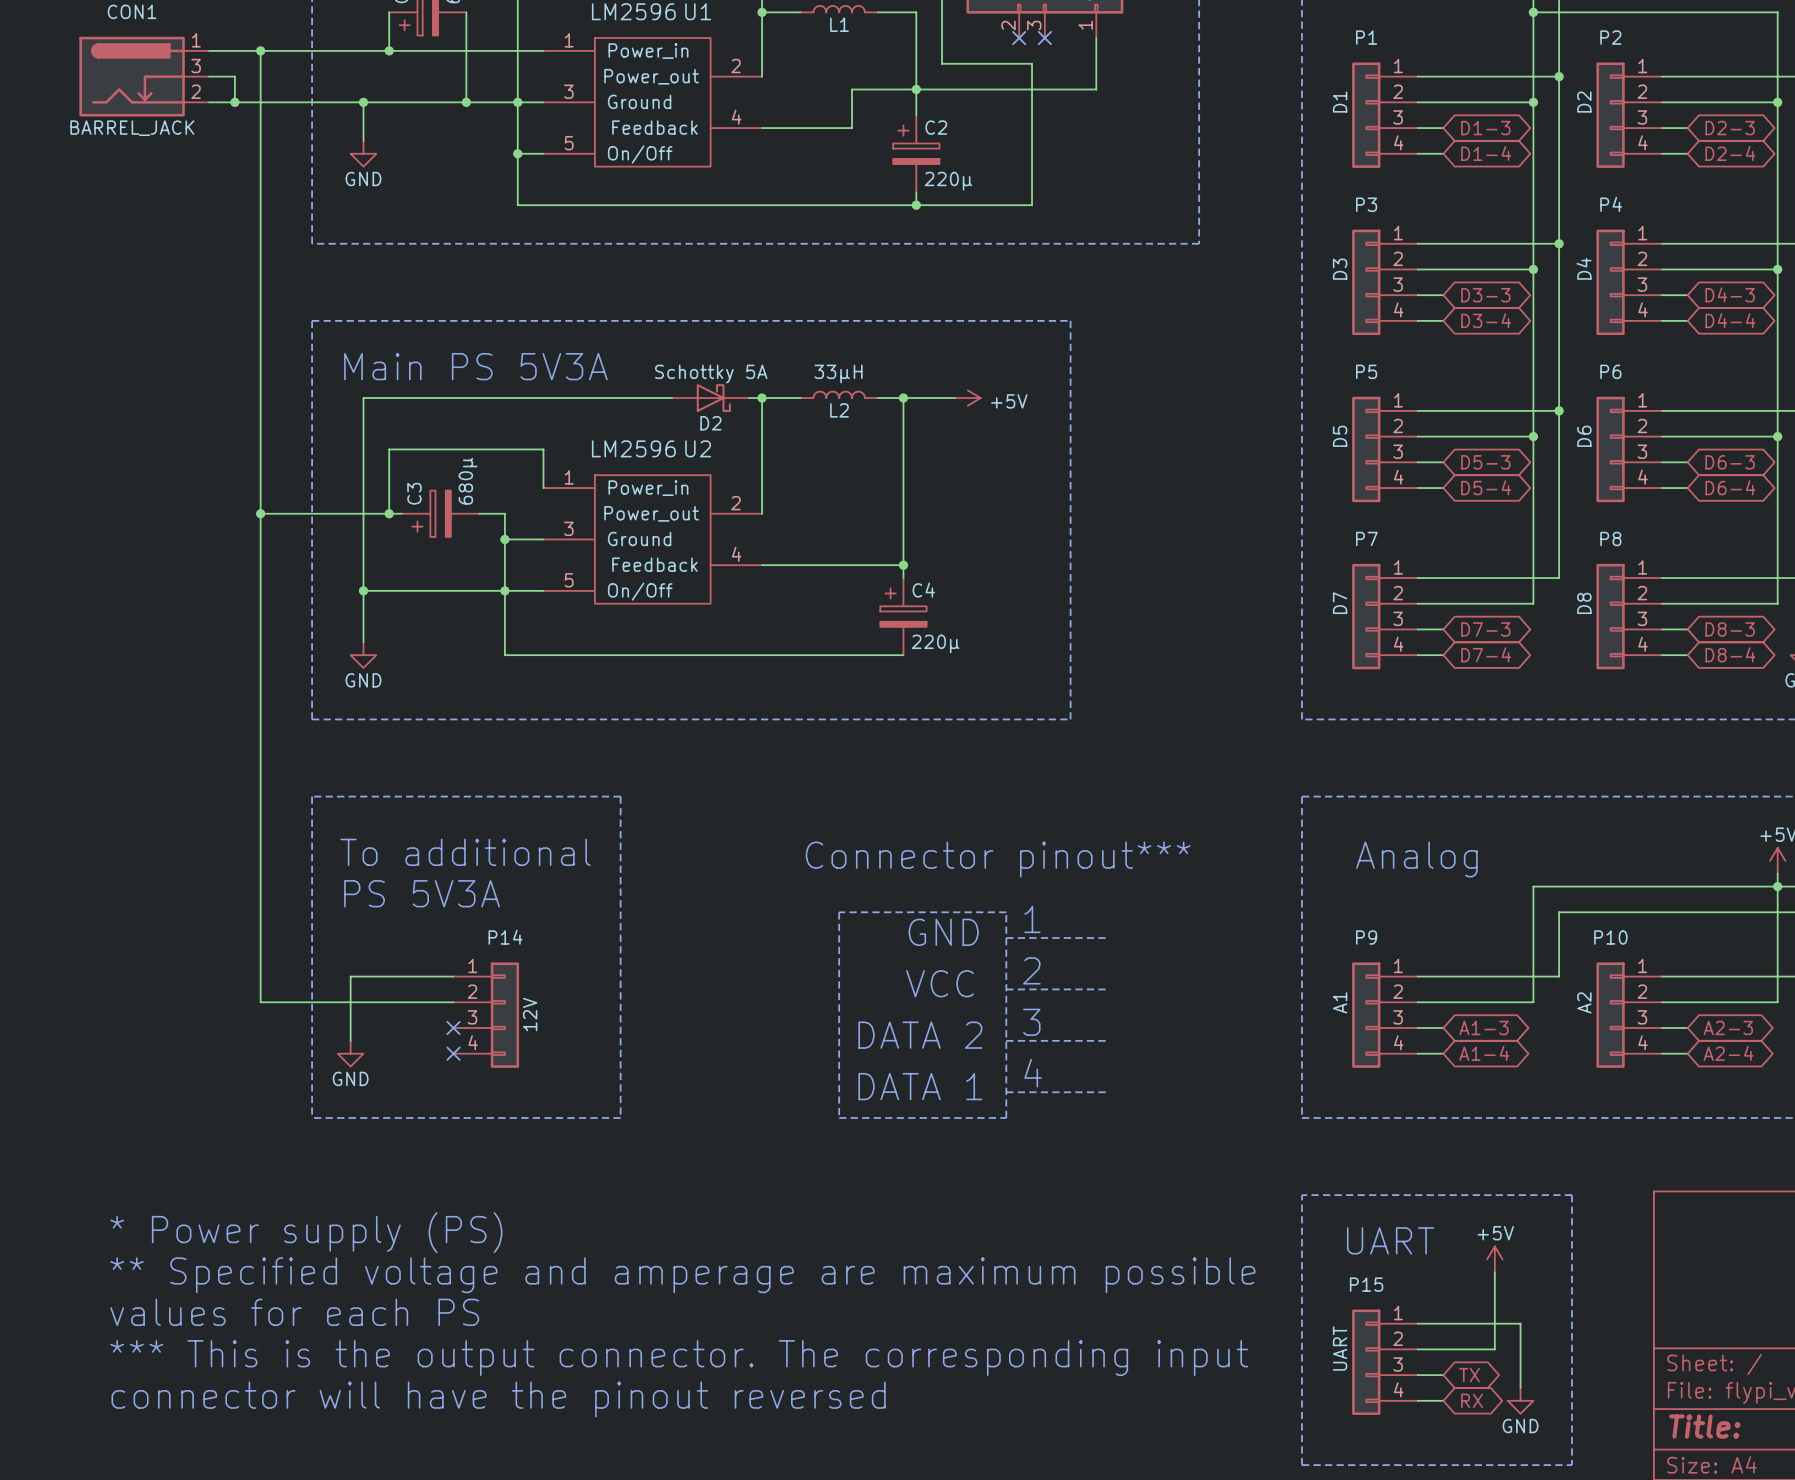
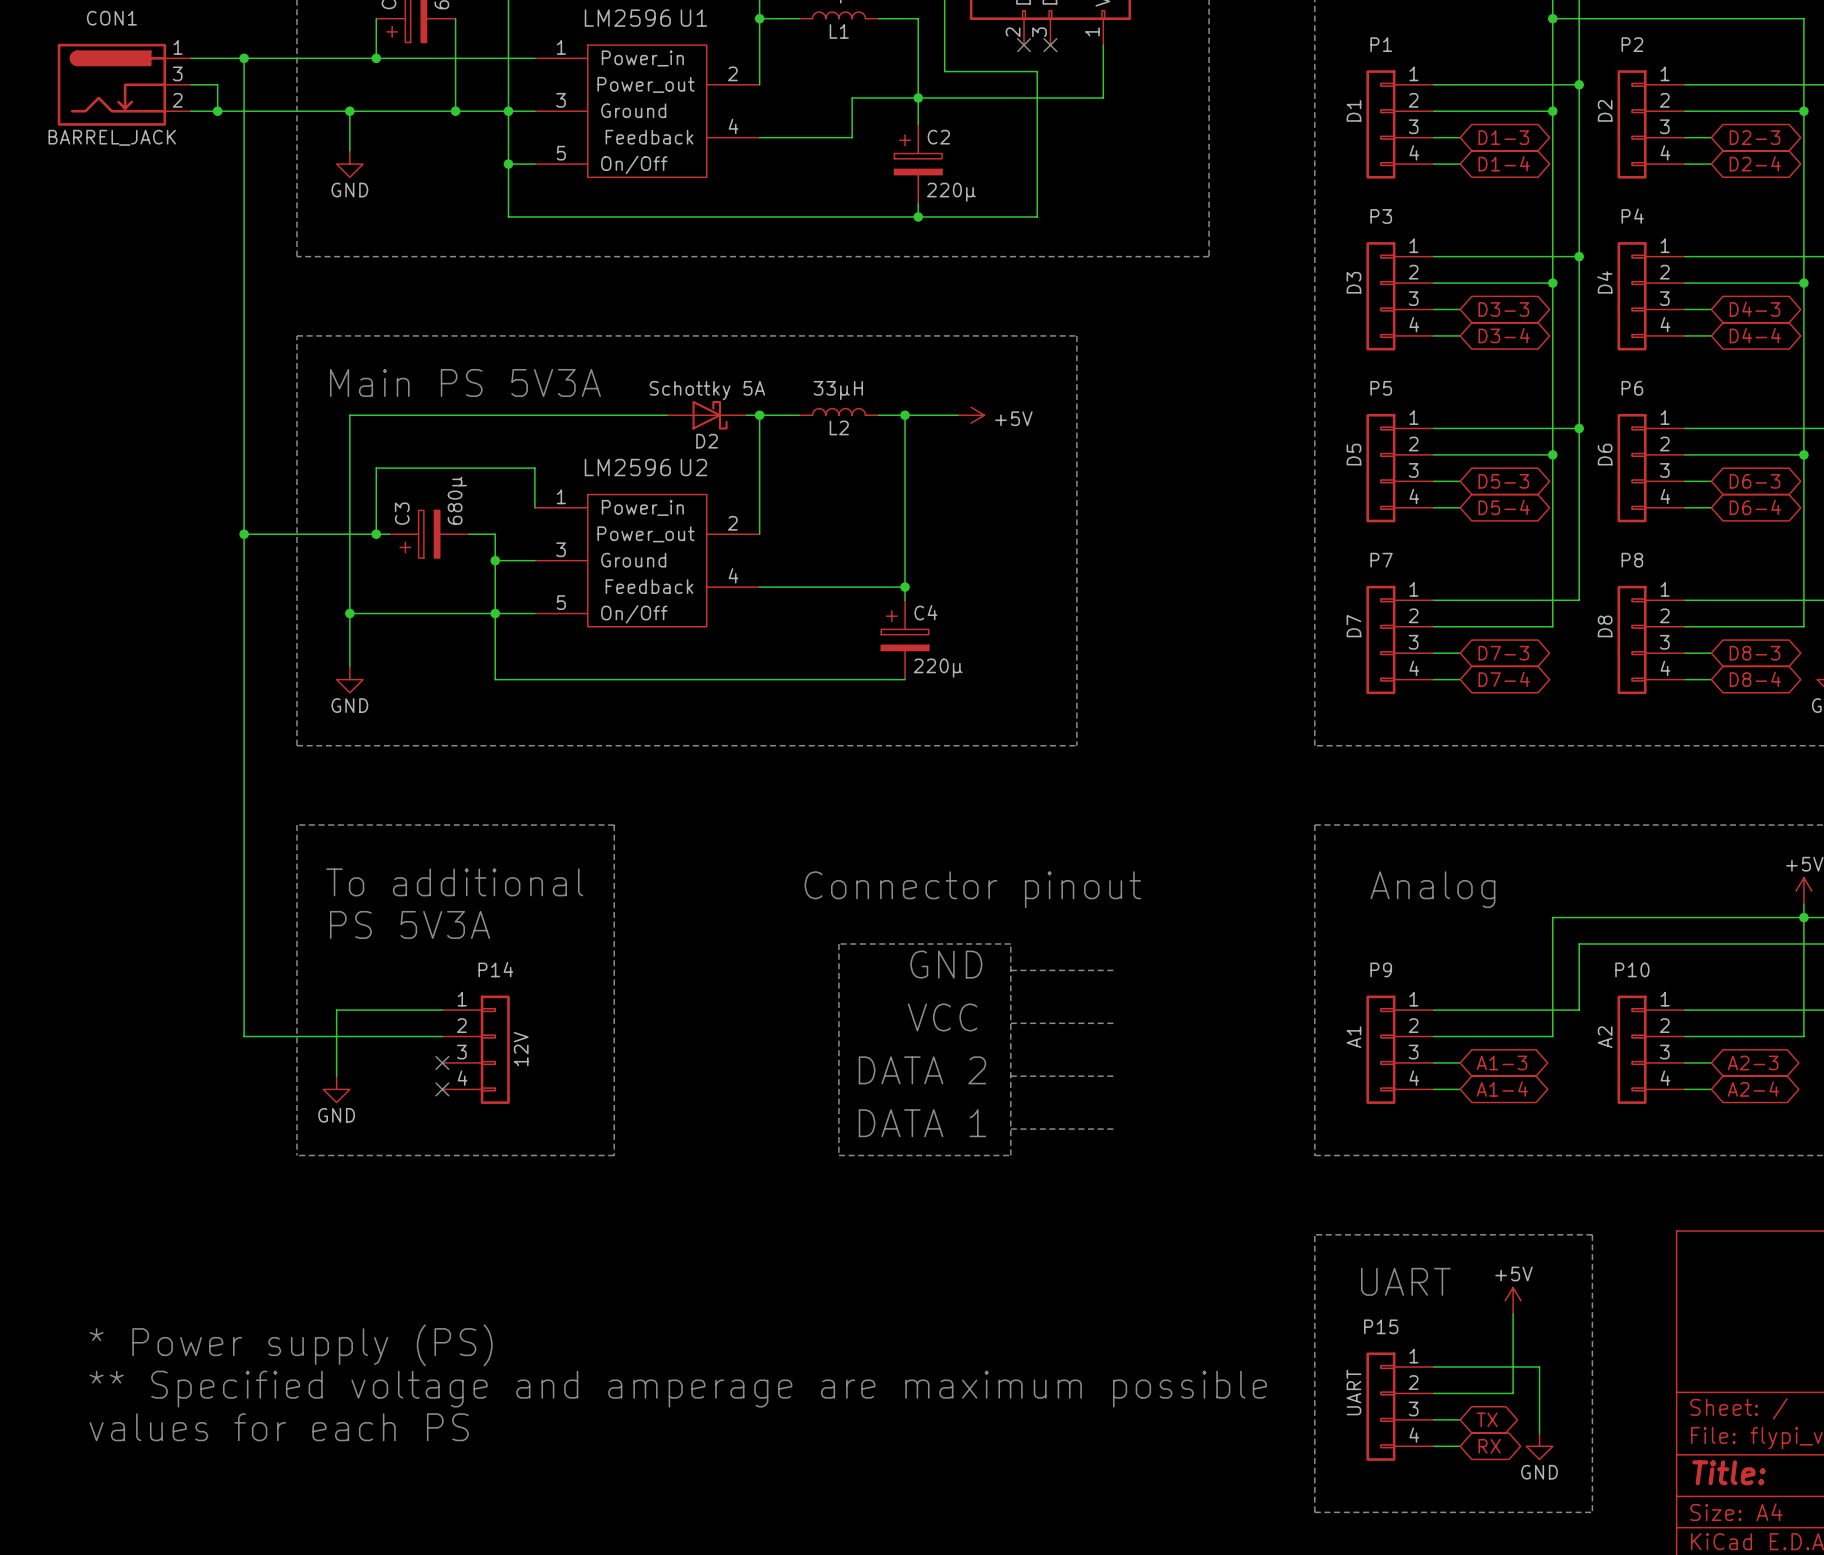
text: Connector pinout*** (998, 859) -> Connector pinout (972, 889)
text: 1 (1032, 919) -> none
text: 2 (1031, 970) -> none
text: 3 (1031, 1022) -> none
text: 4 (1033, 1073) -> none
text position: * Power supply (PS) (306, 1232) -> * Power supply (PS) (291, 1345)
text position: ** Specified voltage and amperage are maximum possible (682, 1275) -> ** Specified voltage and amperage are maximum possible (678, 1389)
text position: values for each PS (294, 1312) -> values for each PS (279, 1427)
text: *** This is the output connector. The corresponding input (679, 1358) -> none
text: connector will have the pinout reversed (498, 1399) -> none

